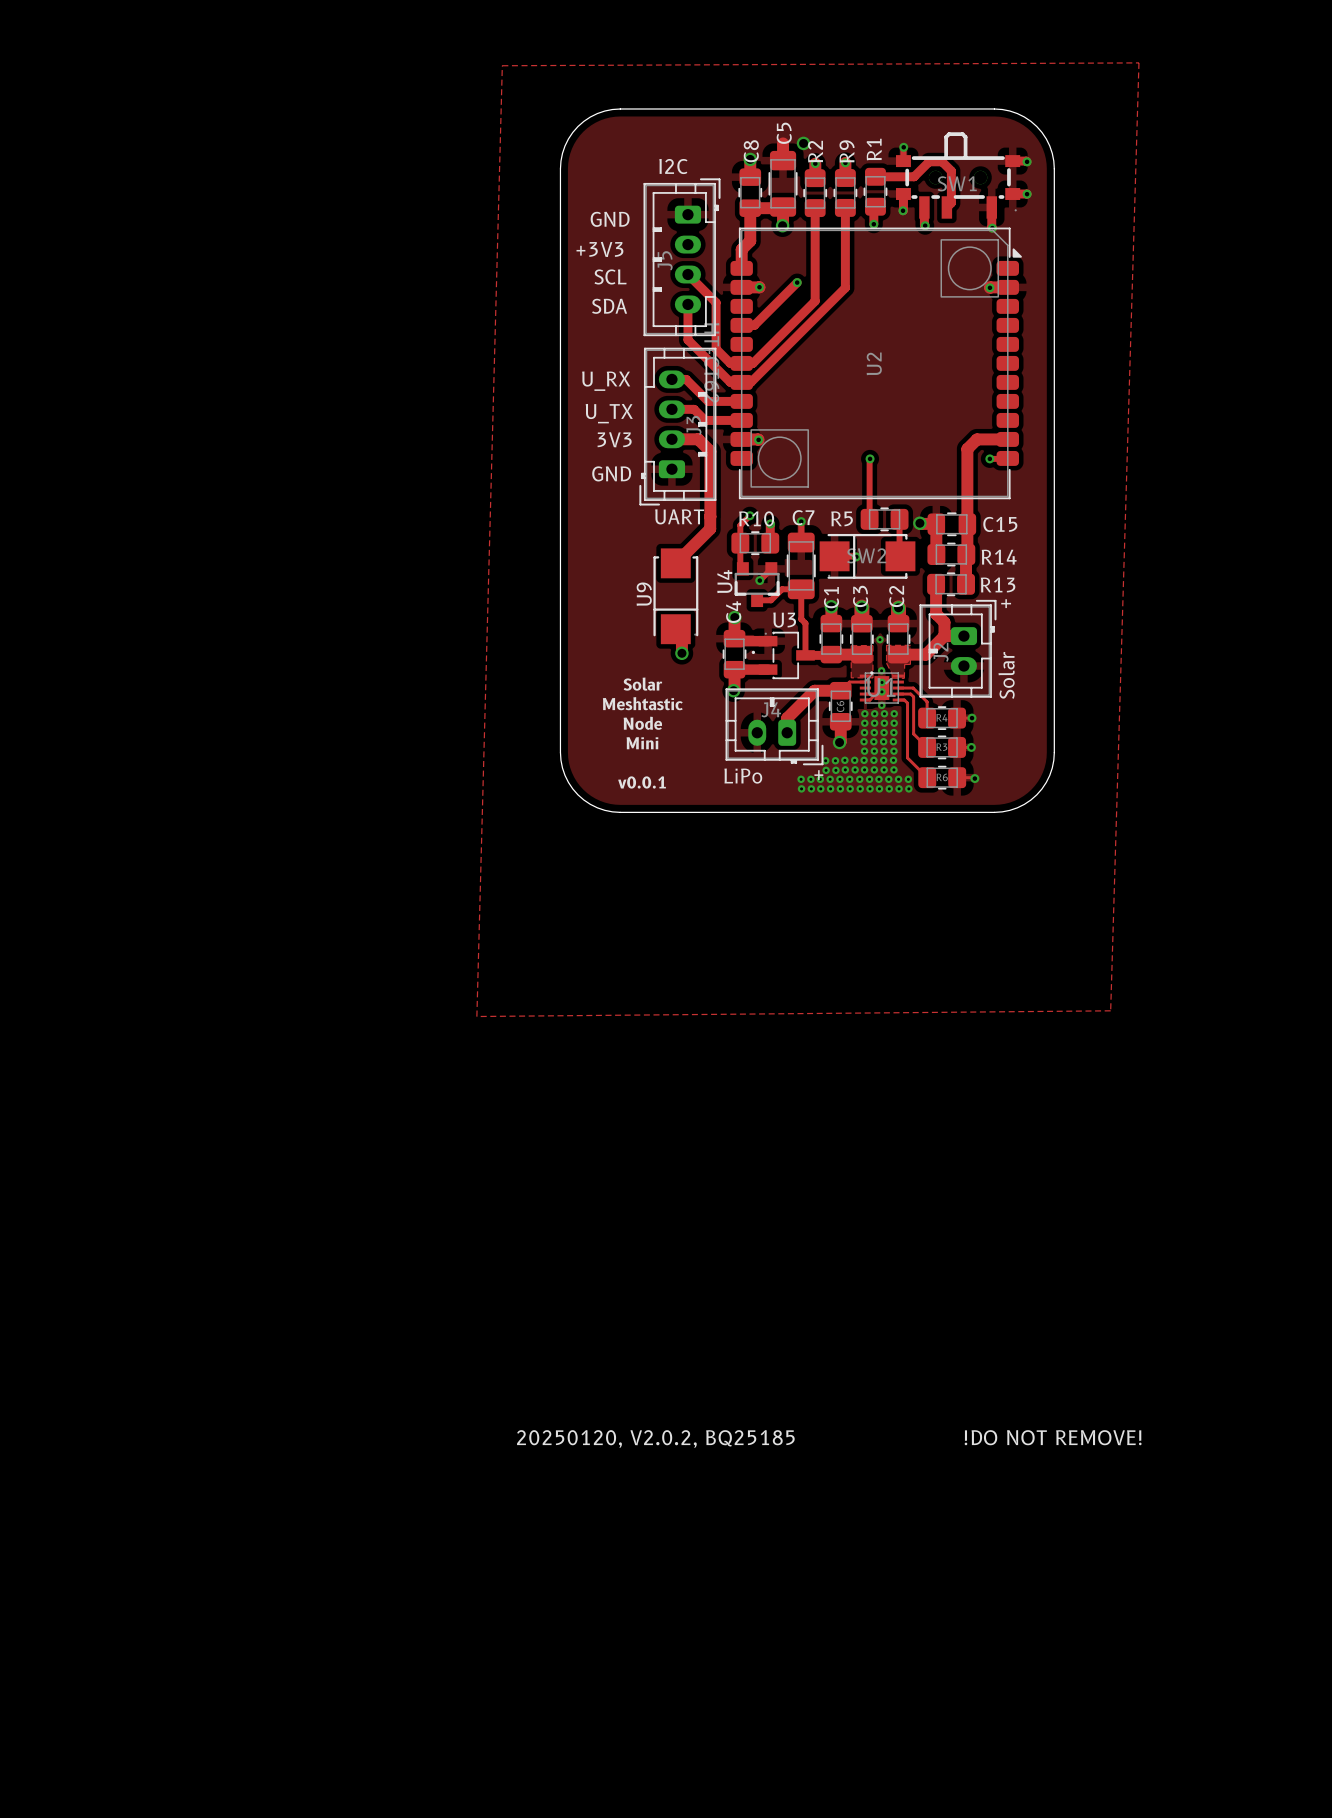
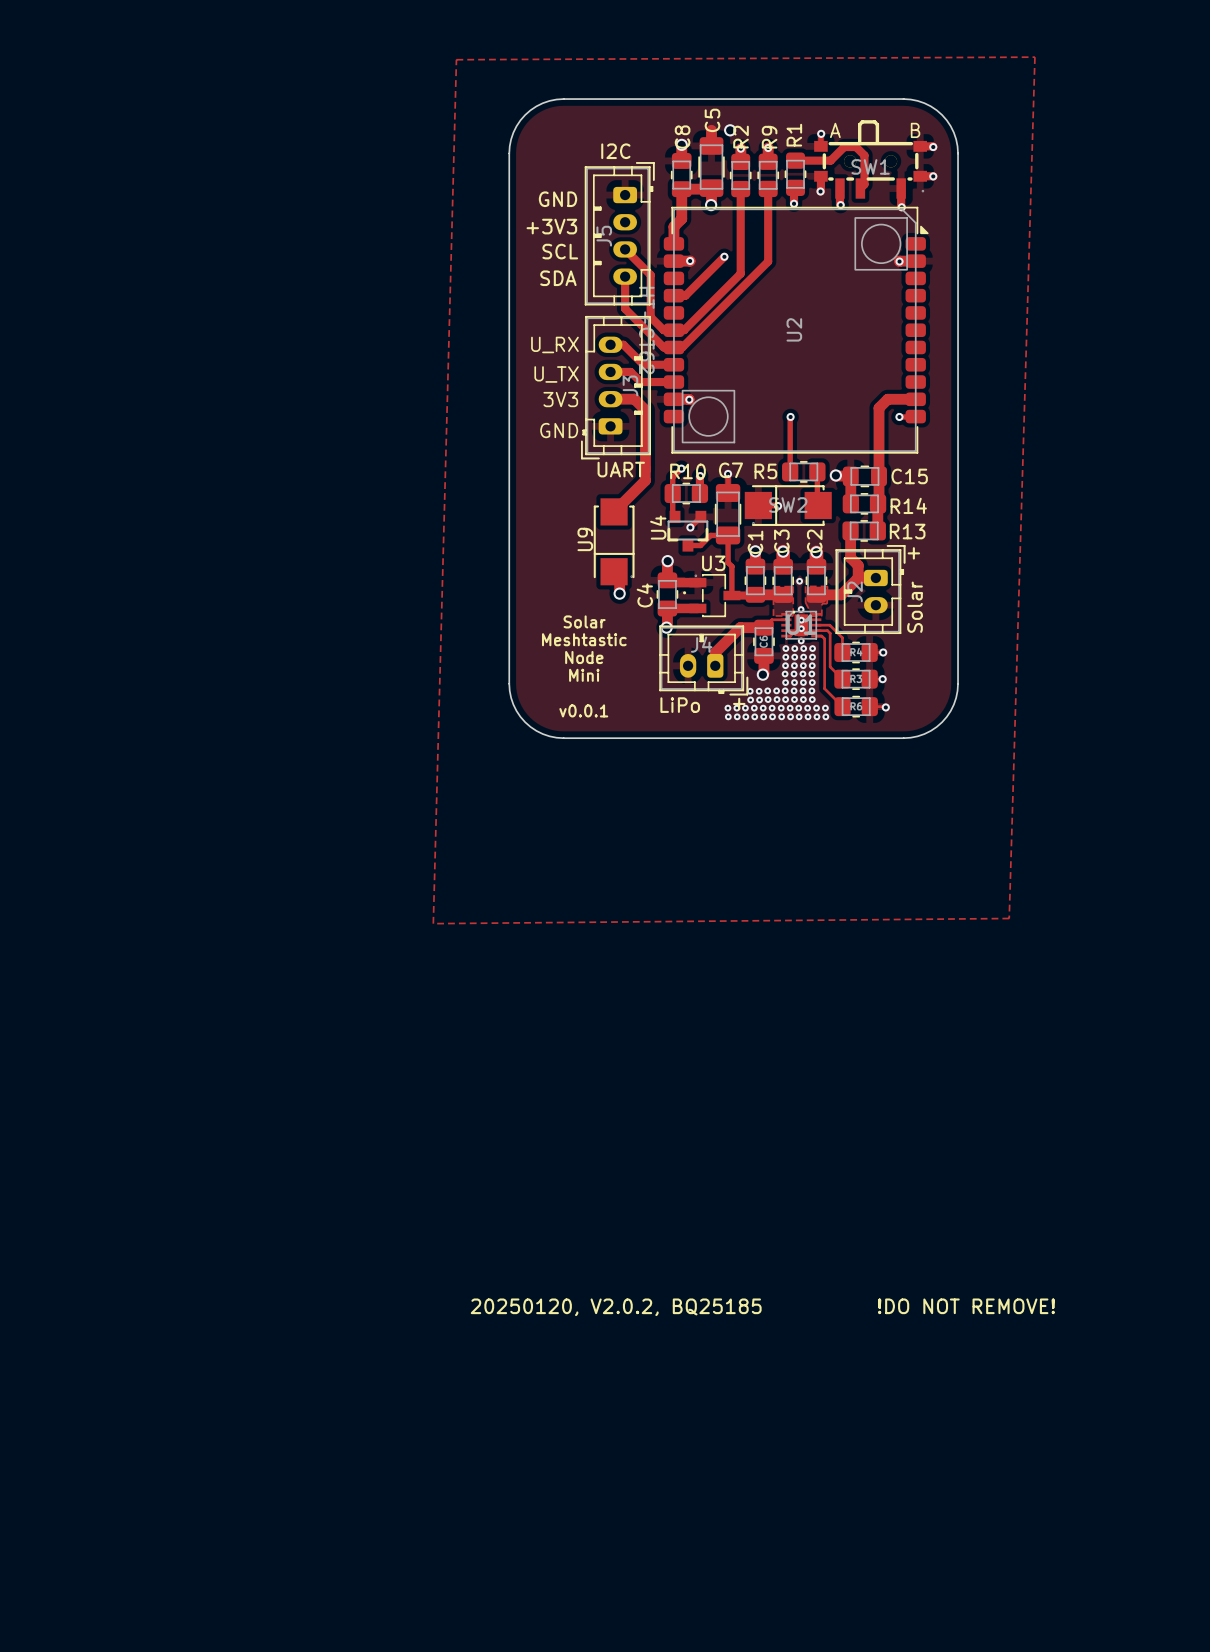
text: none -> A (835, 130)
text: none -> B (915, 130)
C4 name position: C4 (733, 612) -> C4 (644, 595)

